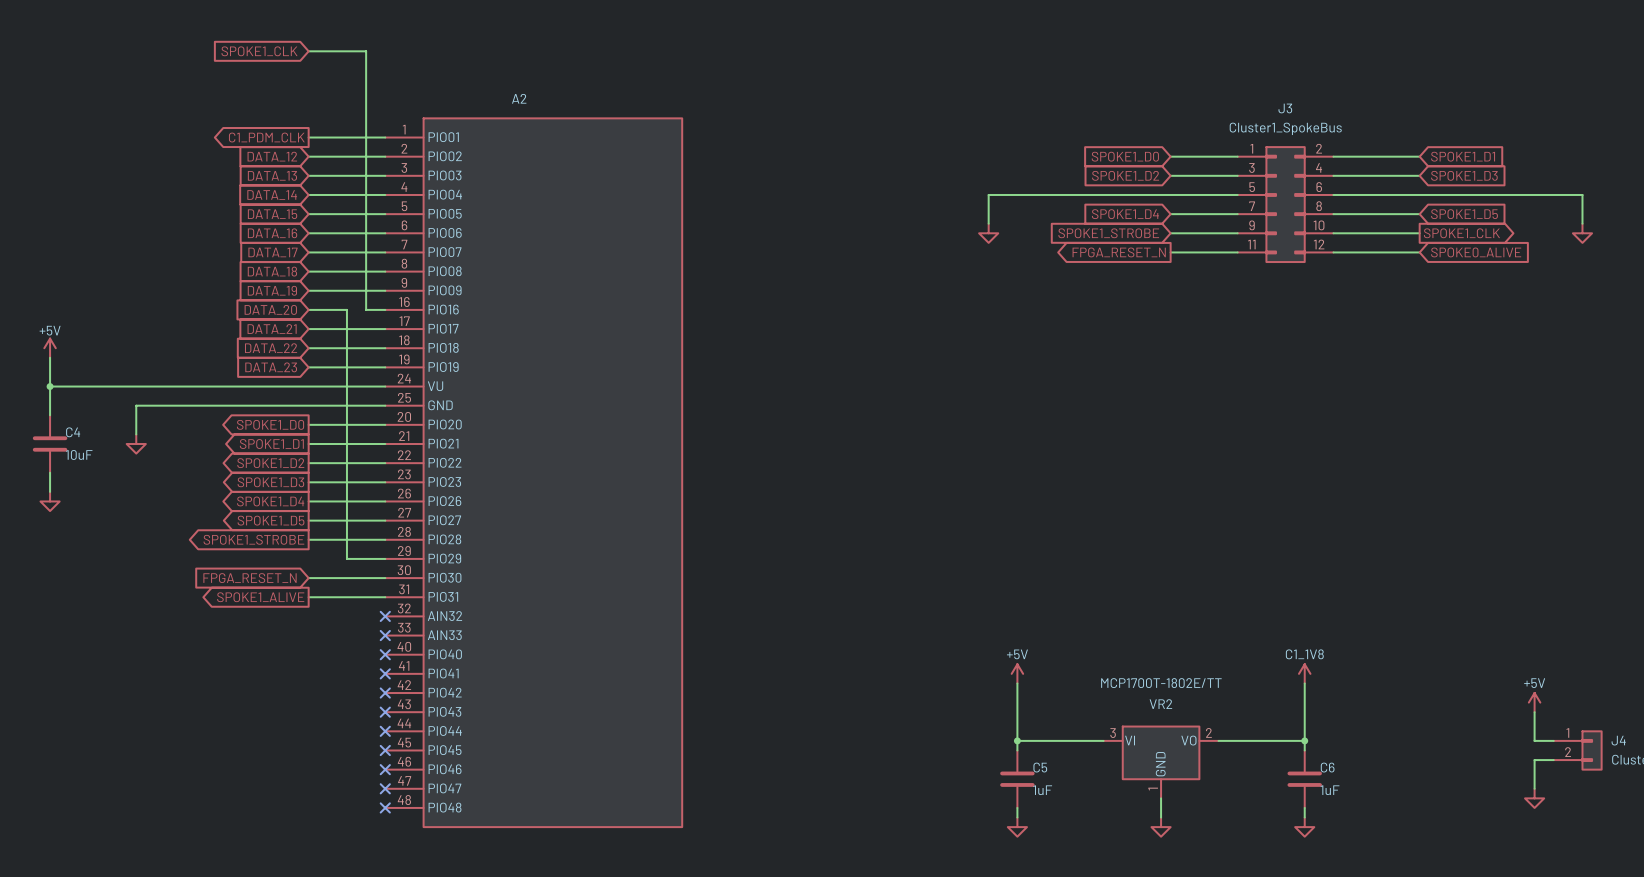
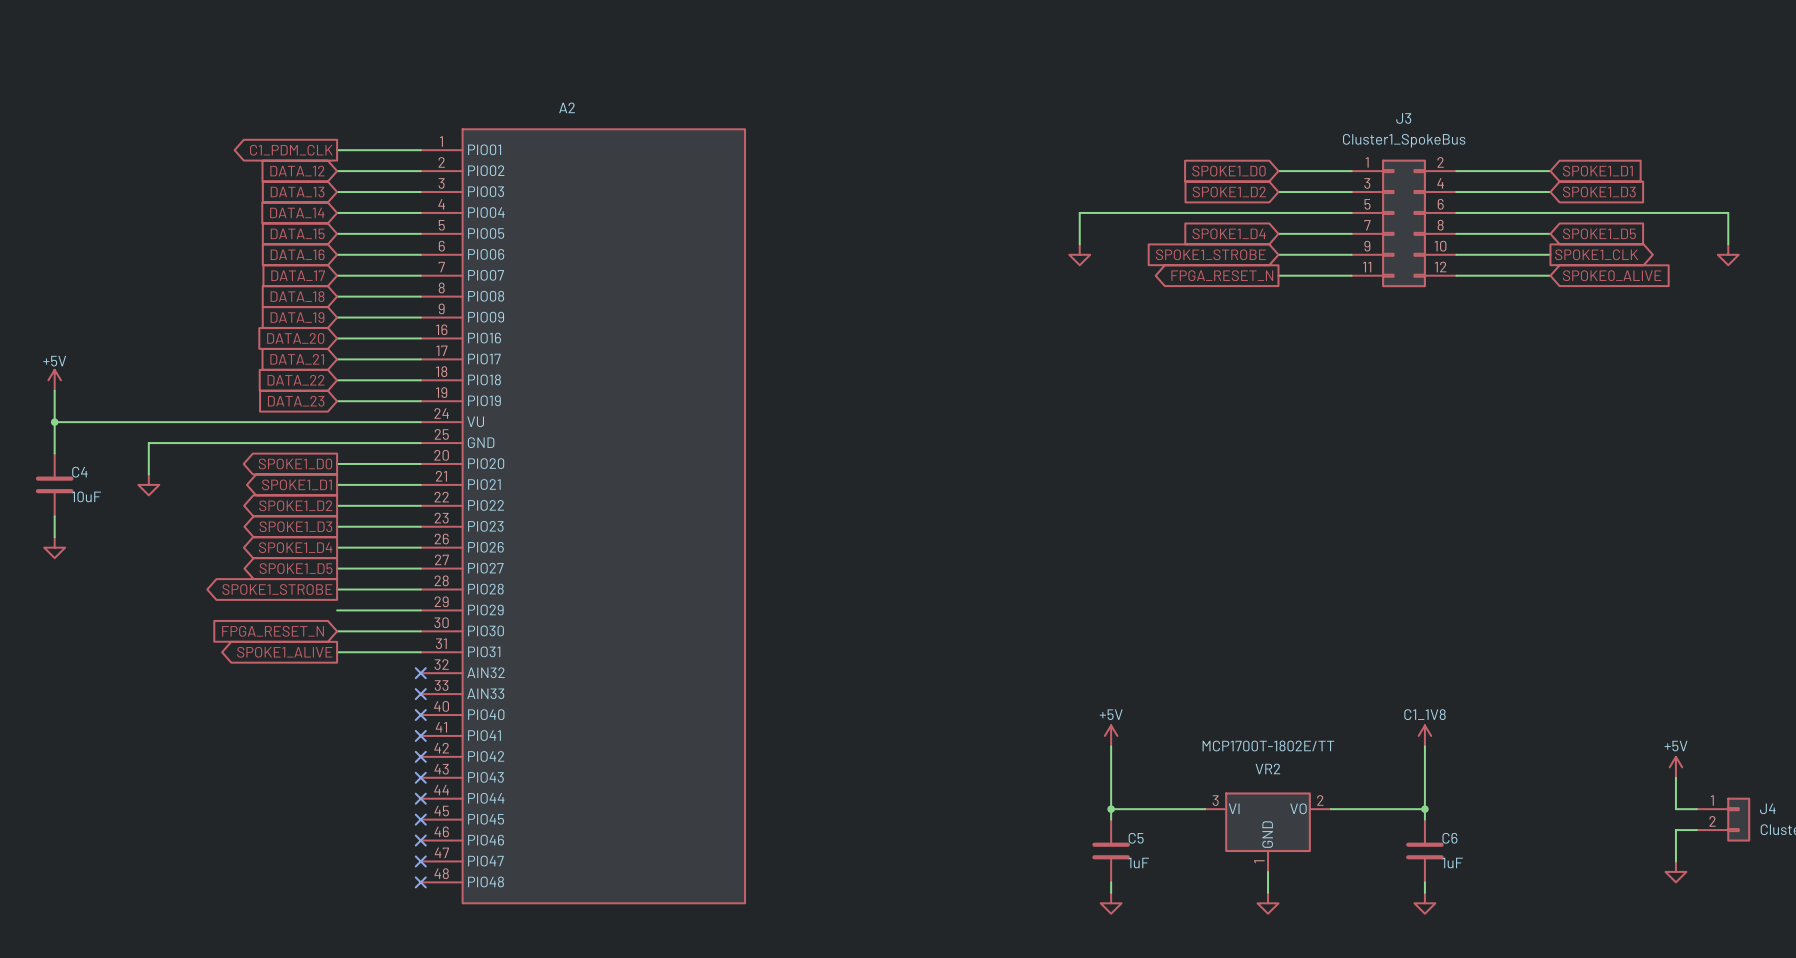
global label: SPOKE1_CLK (259, 51) -> none
wire: (308, 51) (366, 51) (366, 309) -> none
wire: (346, 309) (346, 558) -> (378, 338) (399, 338)
wire: none -> (337, 610) (378, 610)

